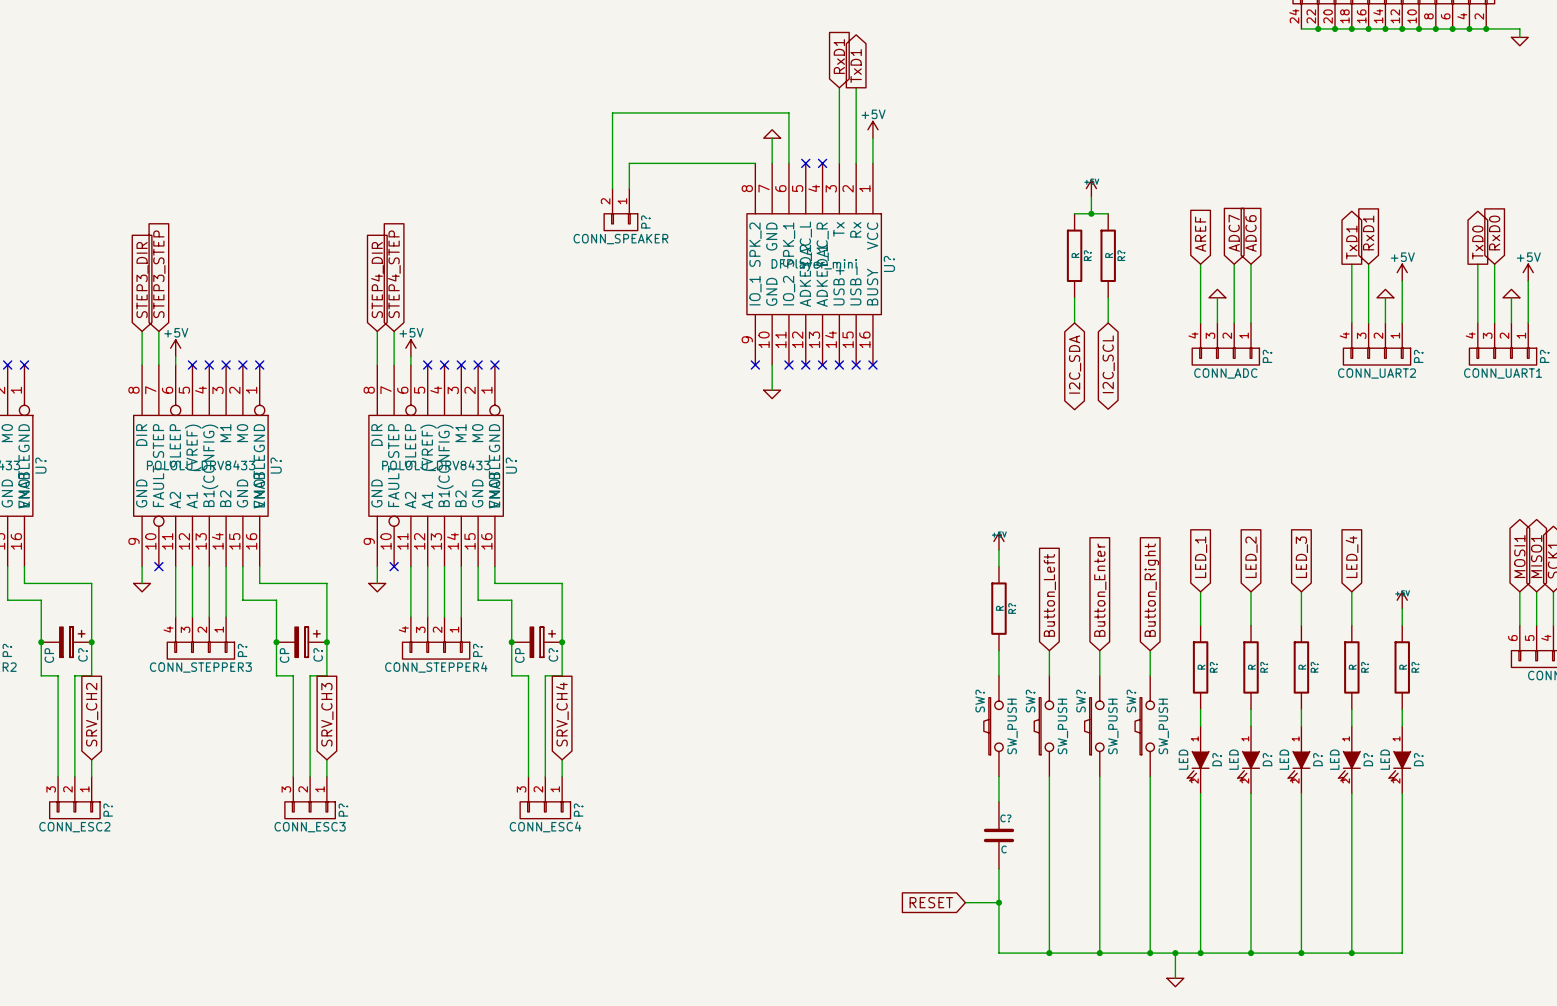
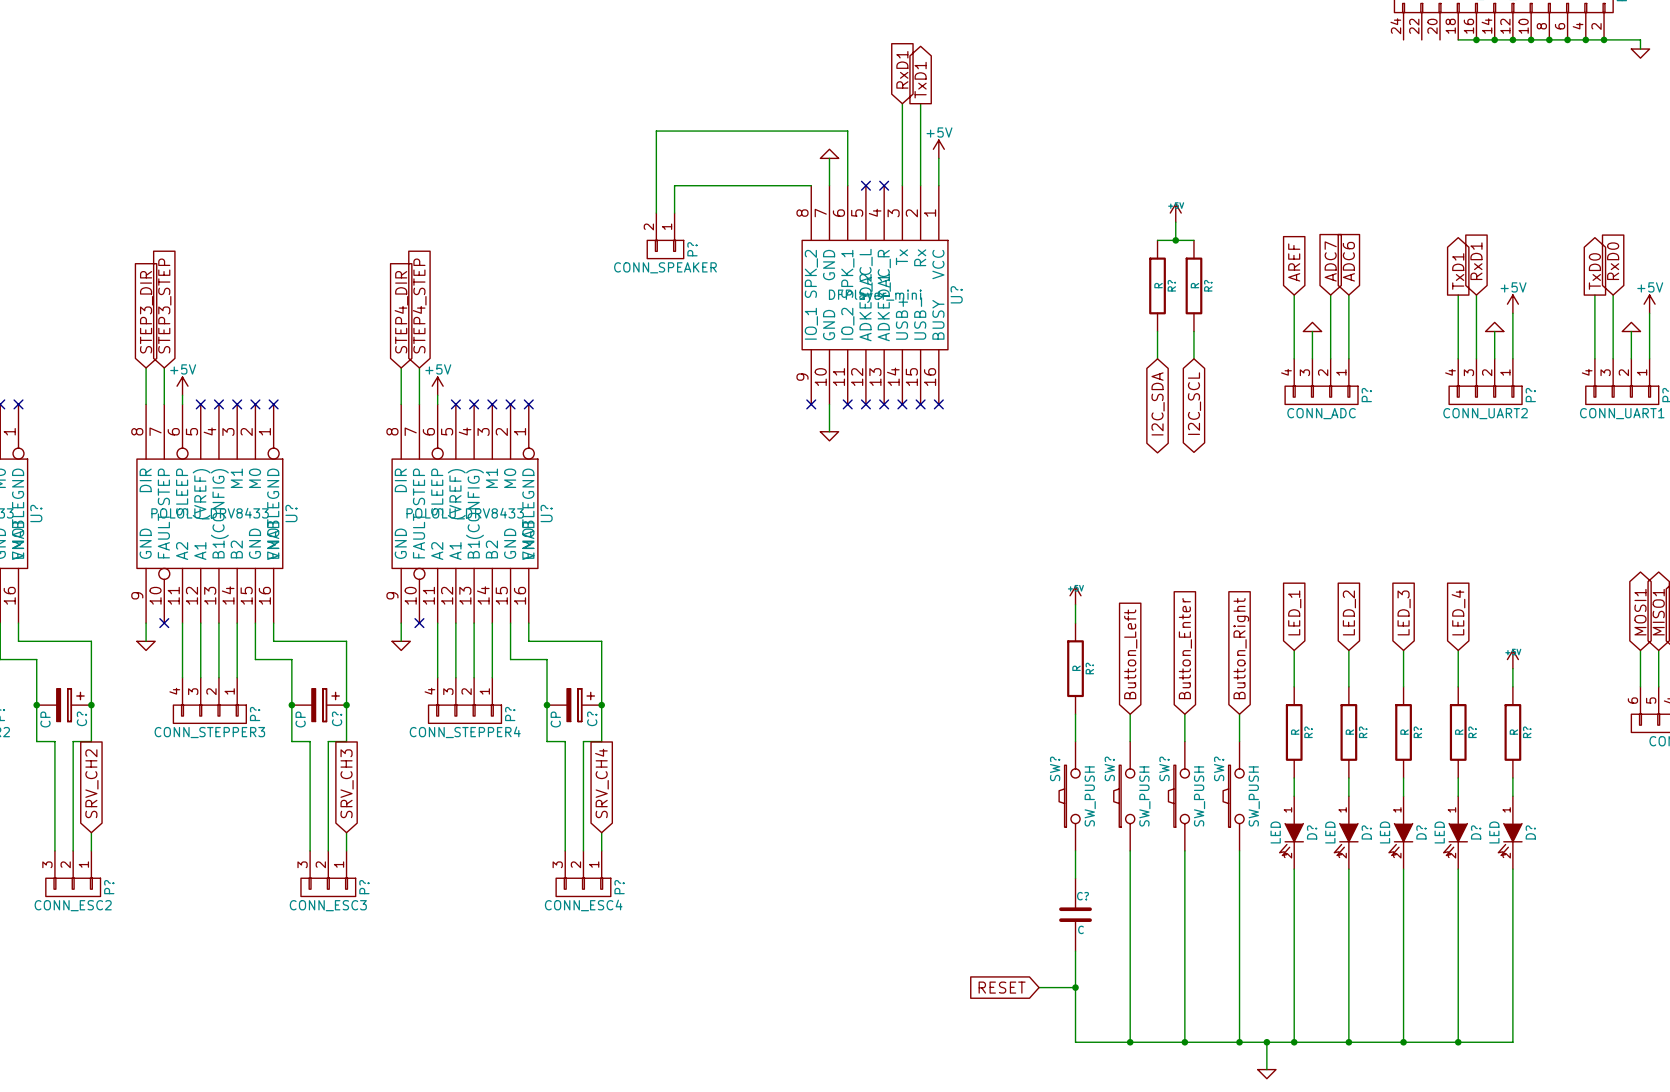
wire: (1301, 28) (1351, 28) -> none
junction: (1318, 28) -> none
junction: (1335, 28) -> none
junction: (1351, 28) -> none

